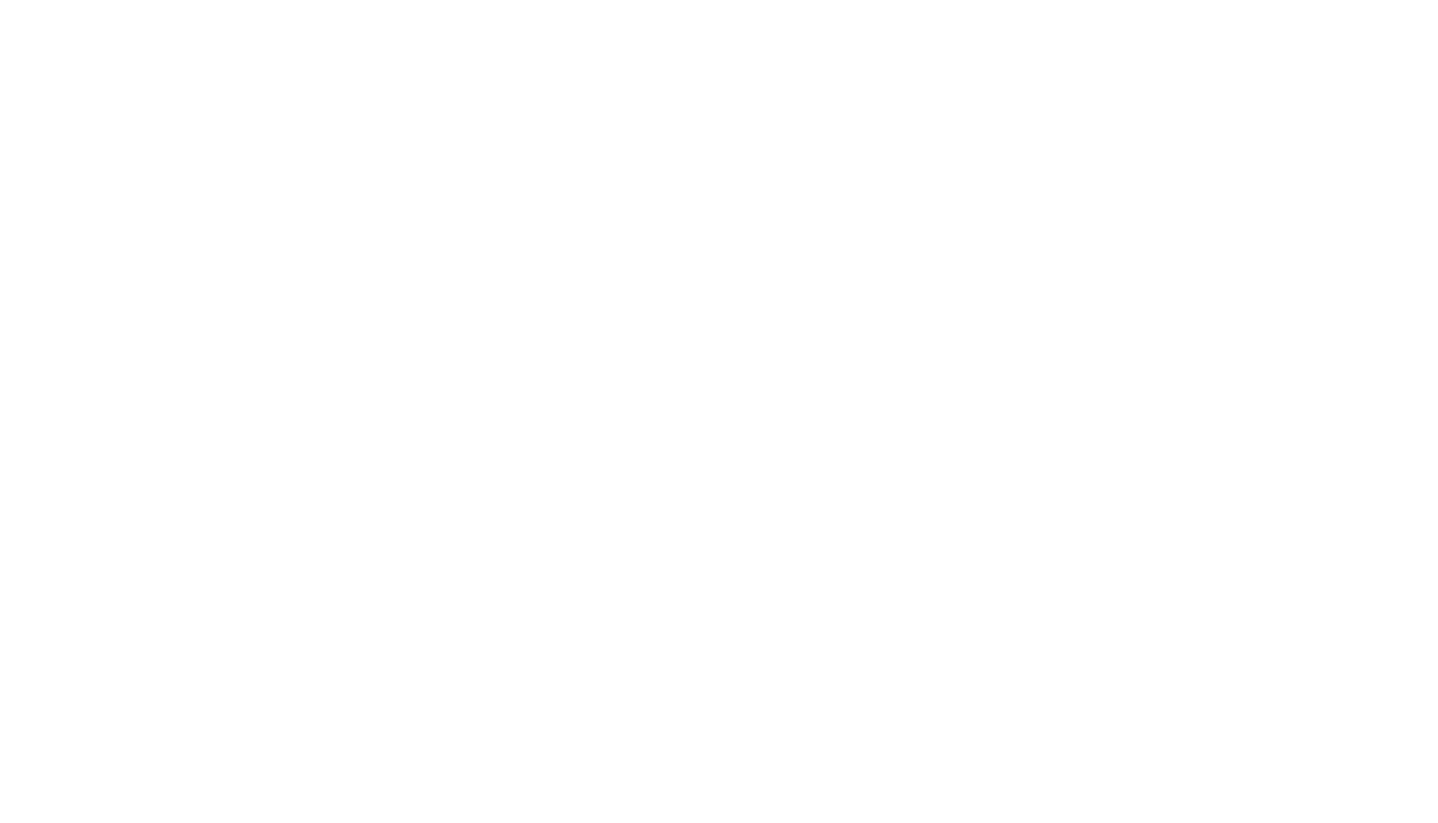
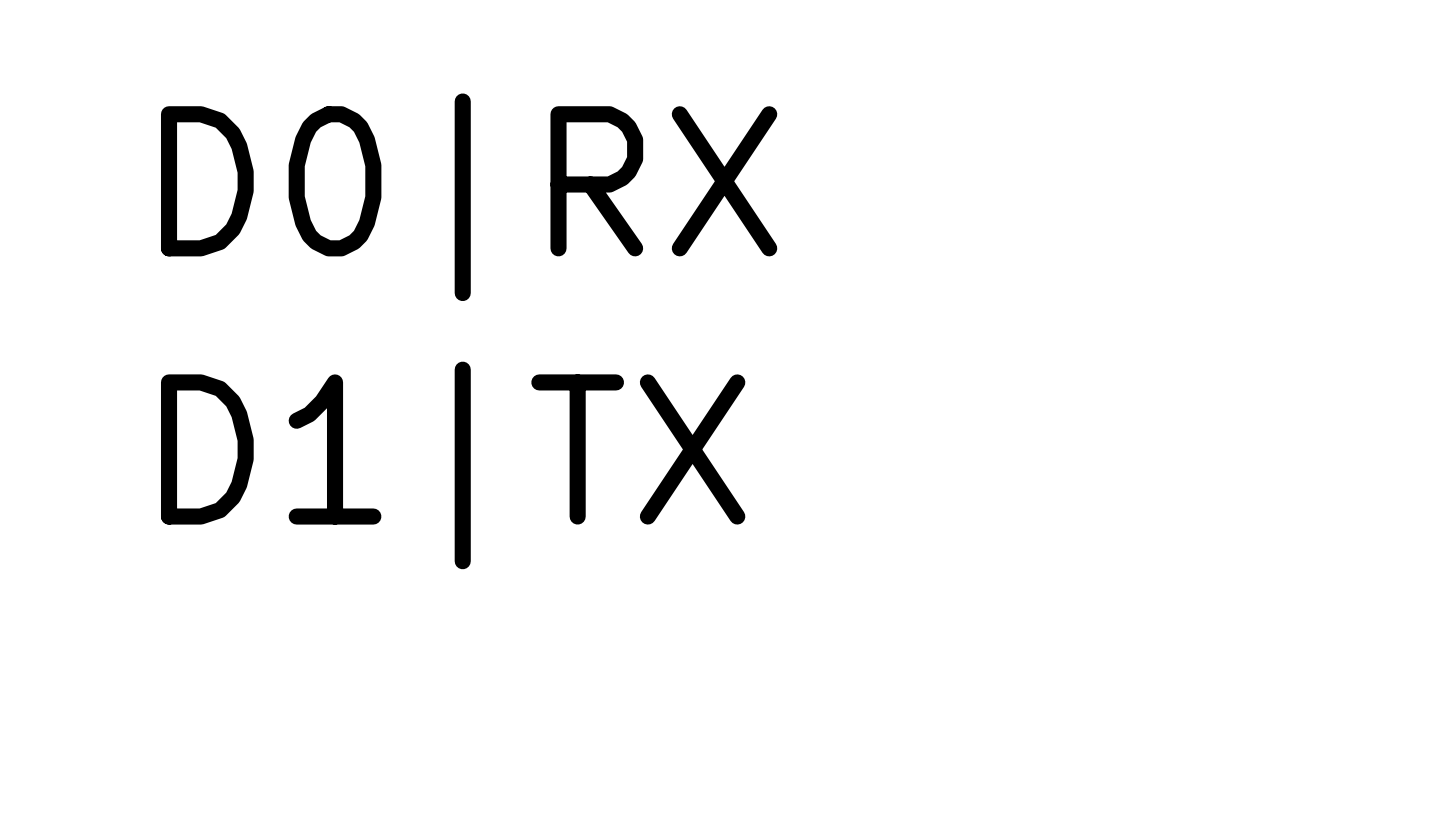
label: none -> D0|RX (469, 197)
label: none -> D1|TX (453, 465)

